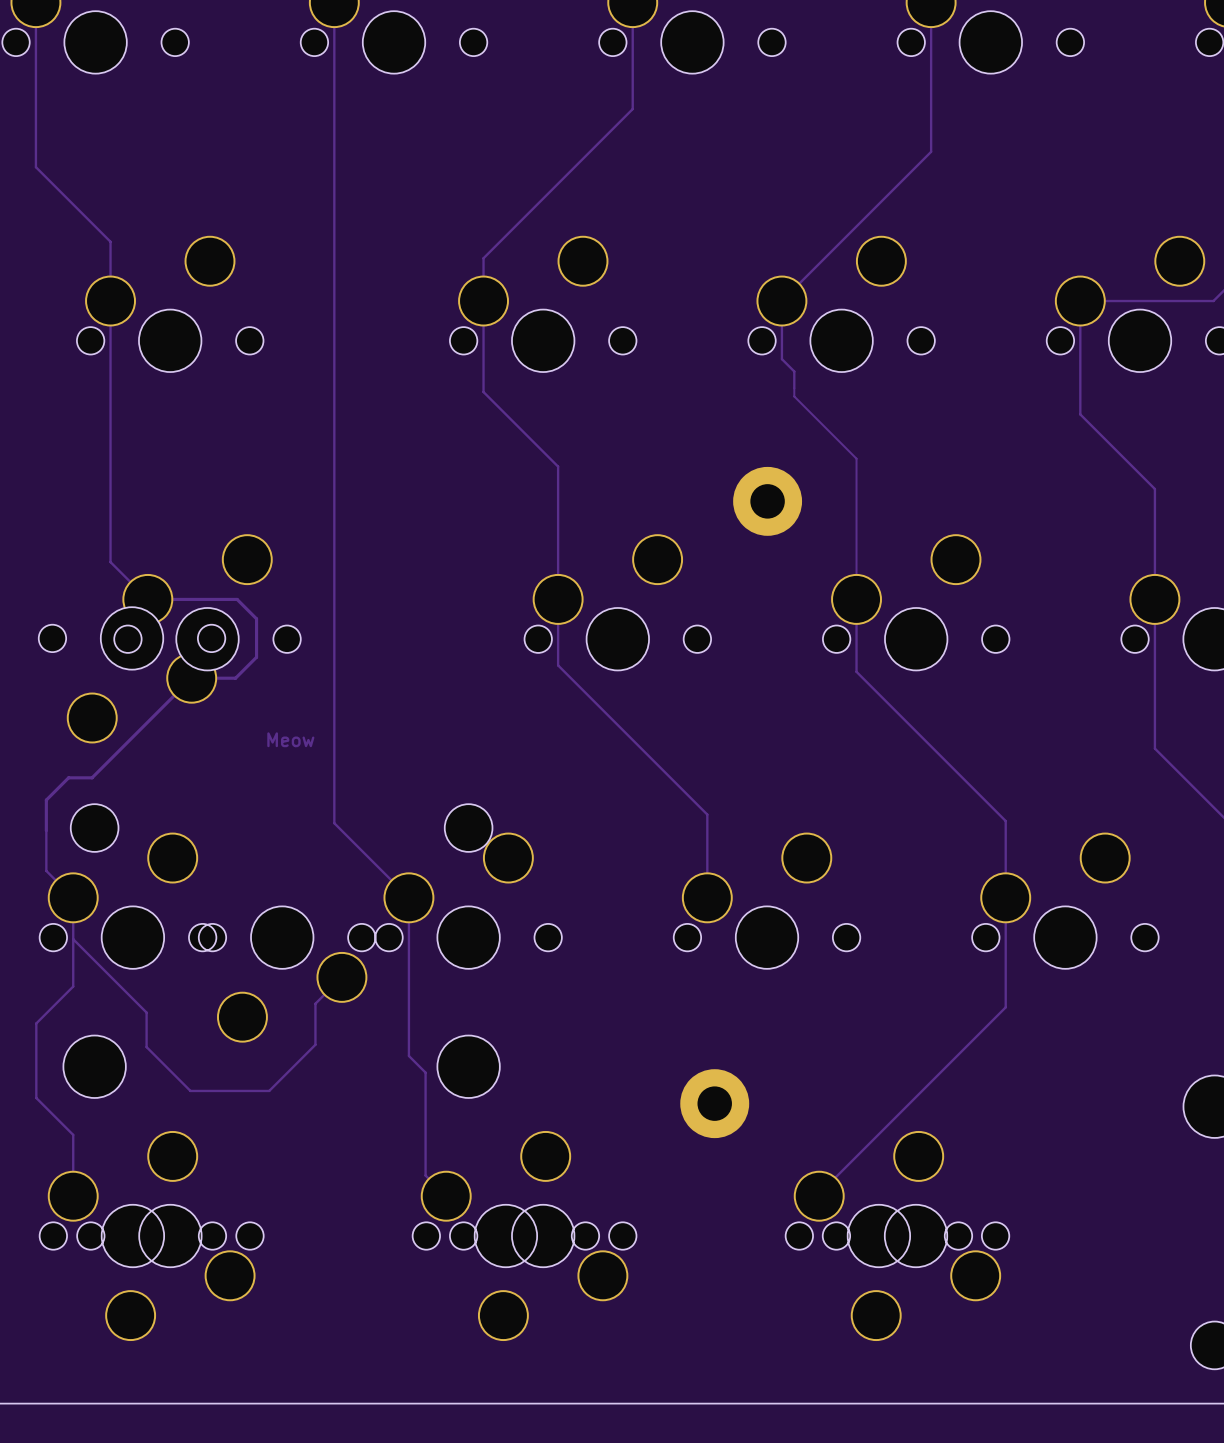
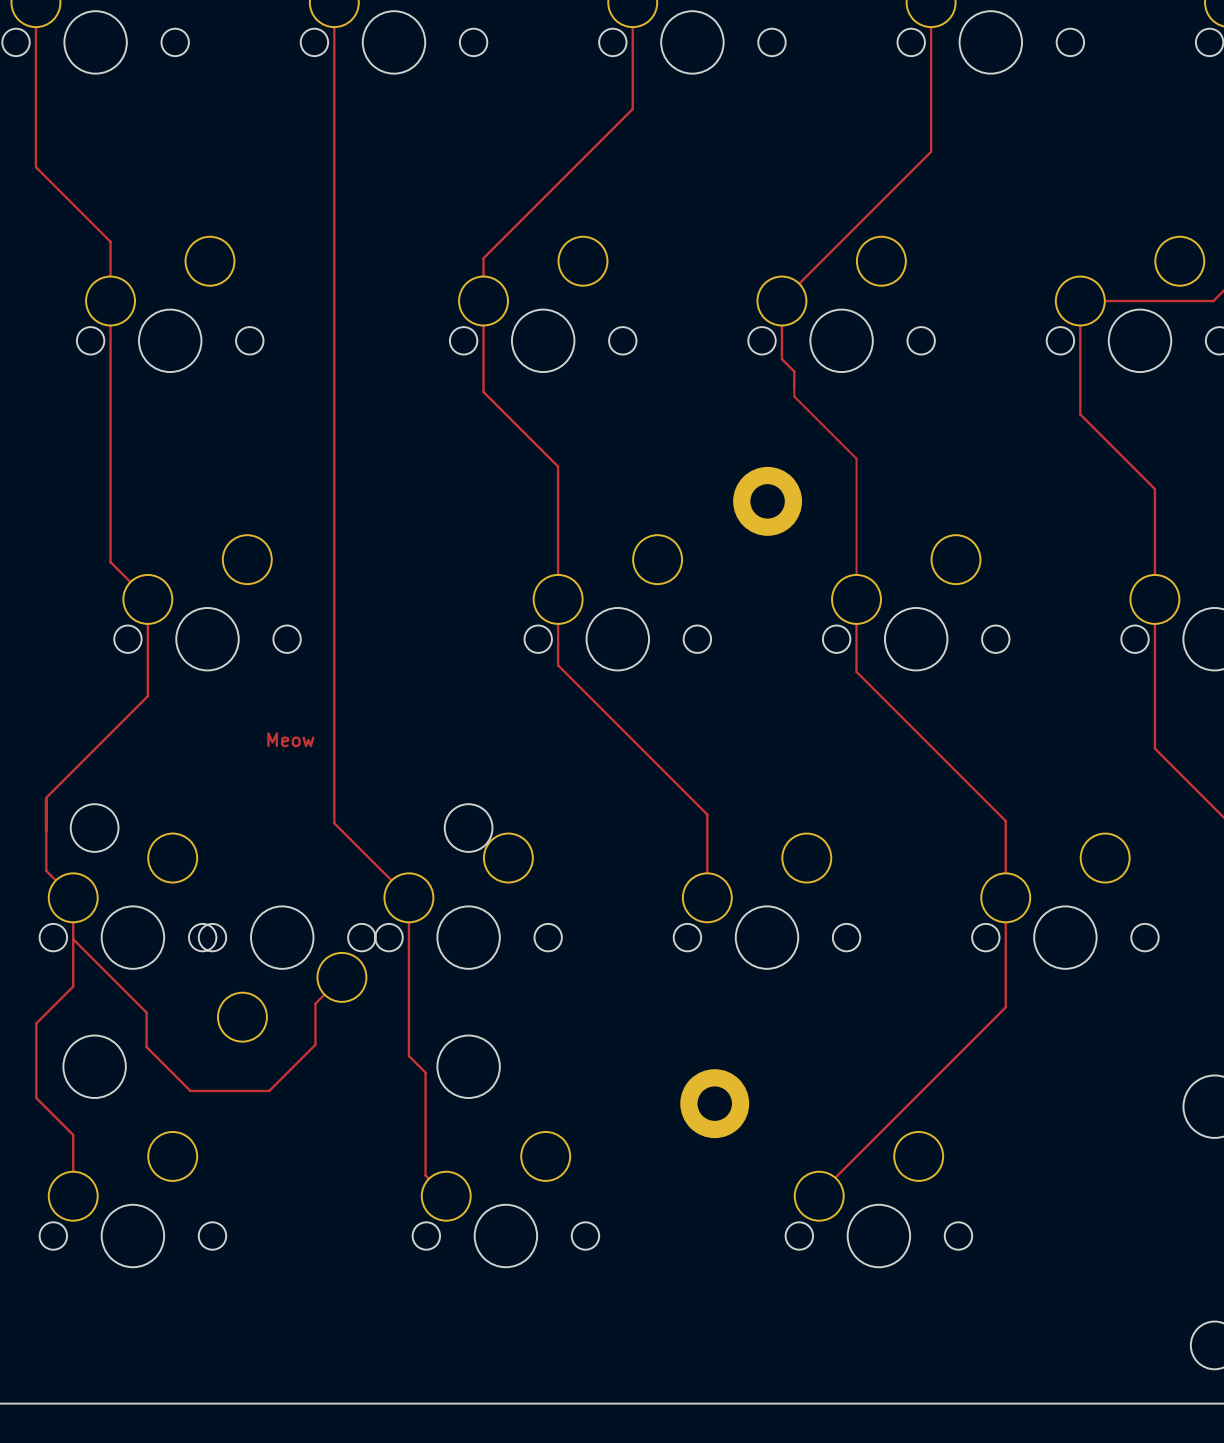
track: (147, 599) (237, 599) (256, 618) (256, 657) (235, 678) (191, 678) (92, 777) (68, 777) (46, 800) -> (147, 599) (147, 696) (46, 797) (46, 800)
part: (132, 675) -> none
part: (170, 1272) -> none
part: (543, 1272) -> none
part: (916, 1272) -> none

